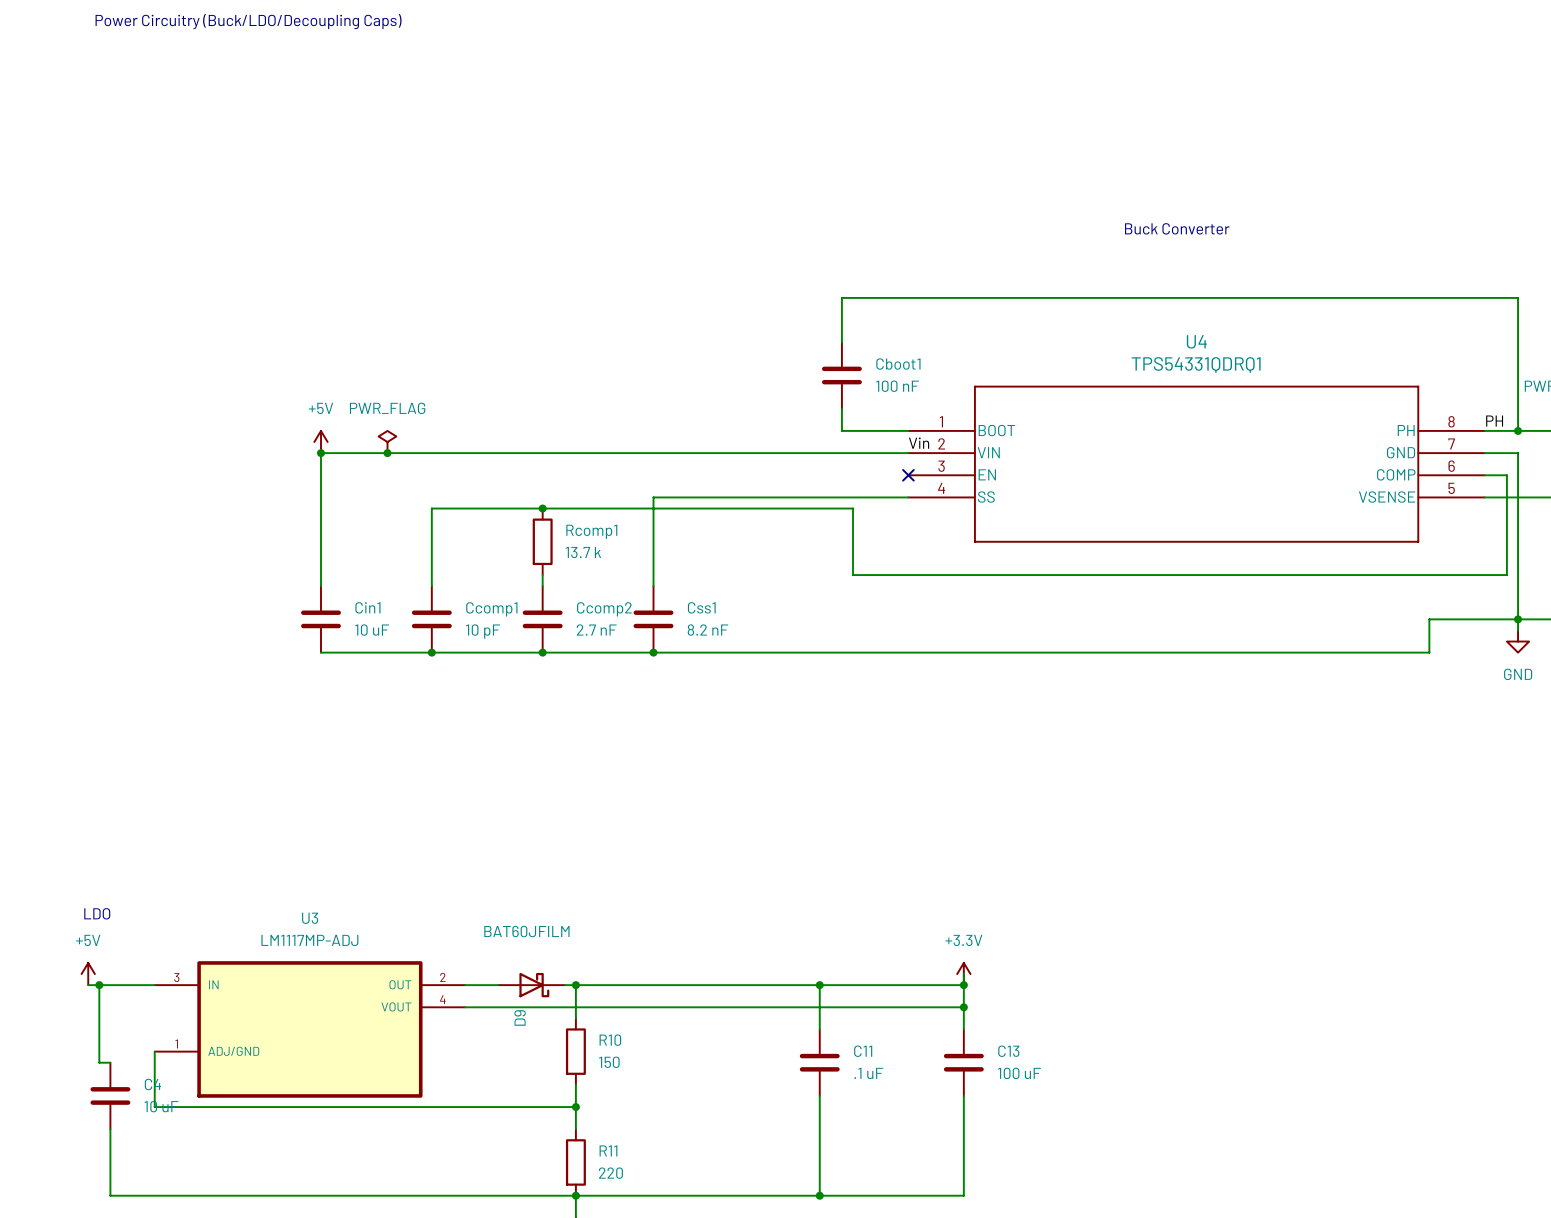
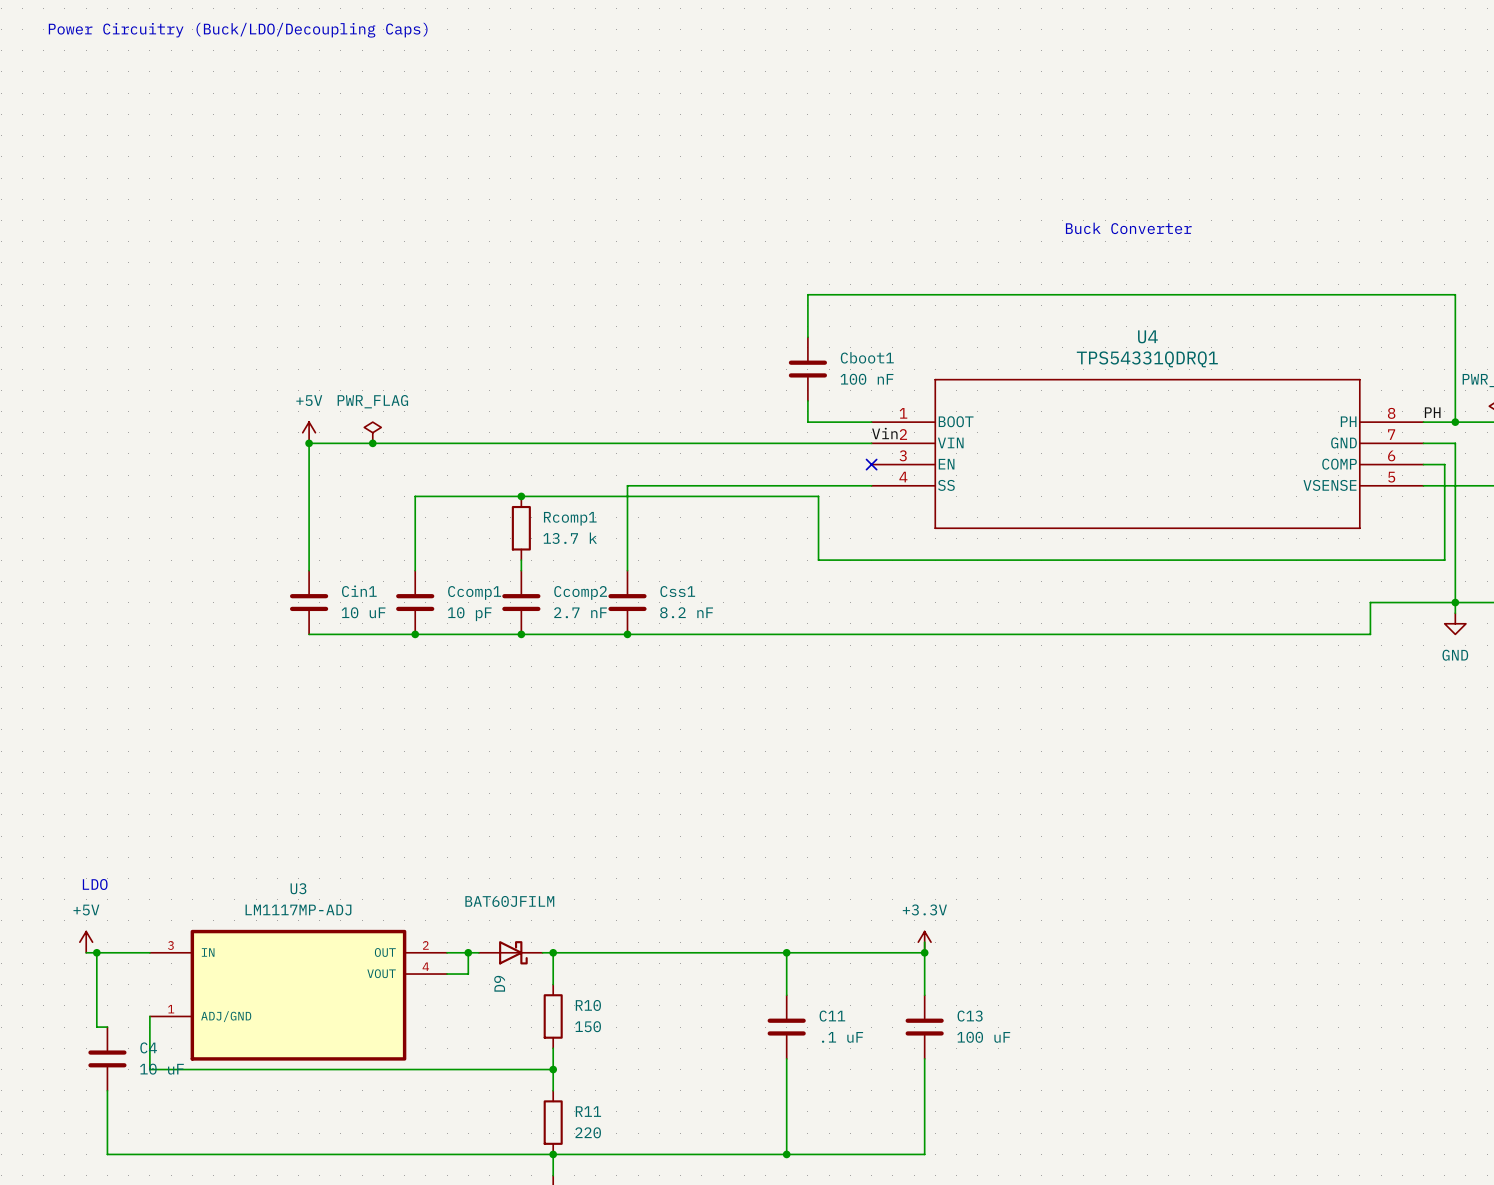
junction: none -> (468, 952)
wire: (487, 1007) (963, 1007) -> (468, 974) (468, 952)
junction: (963, 1007) -> none

